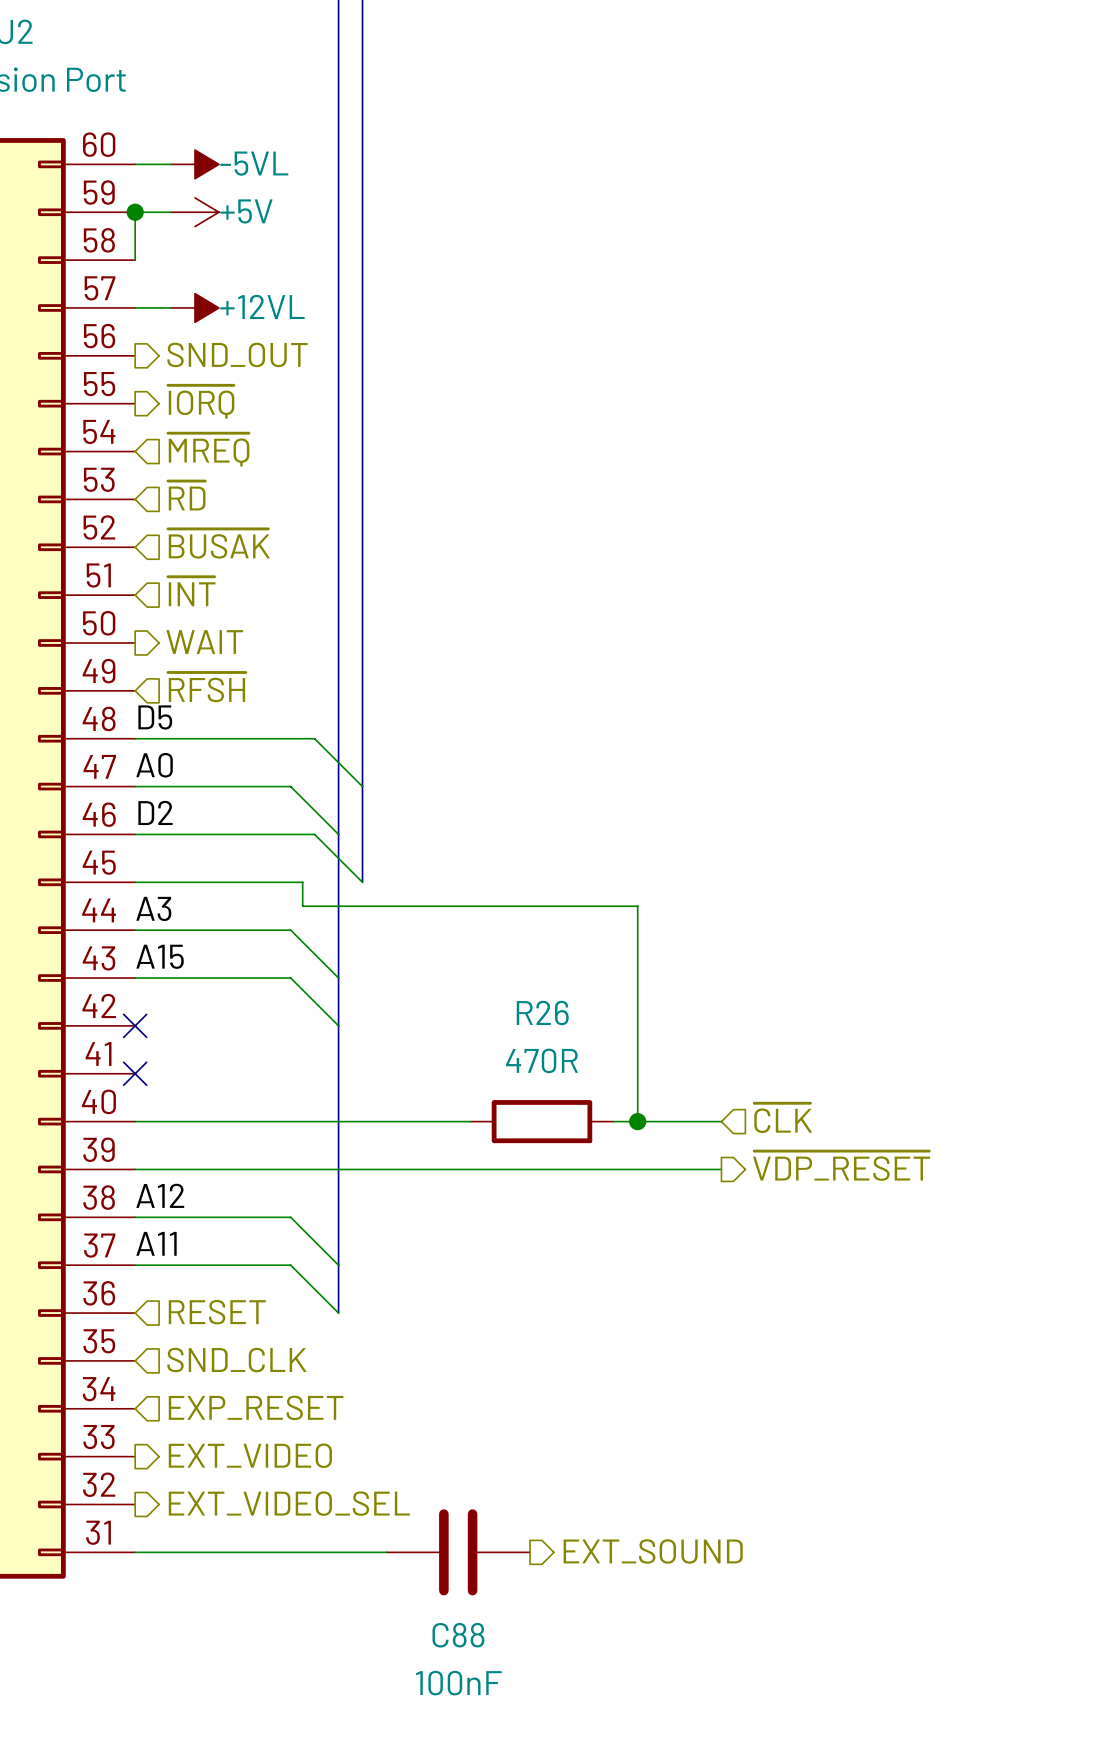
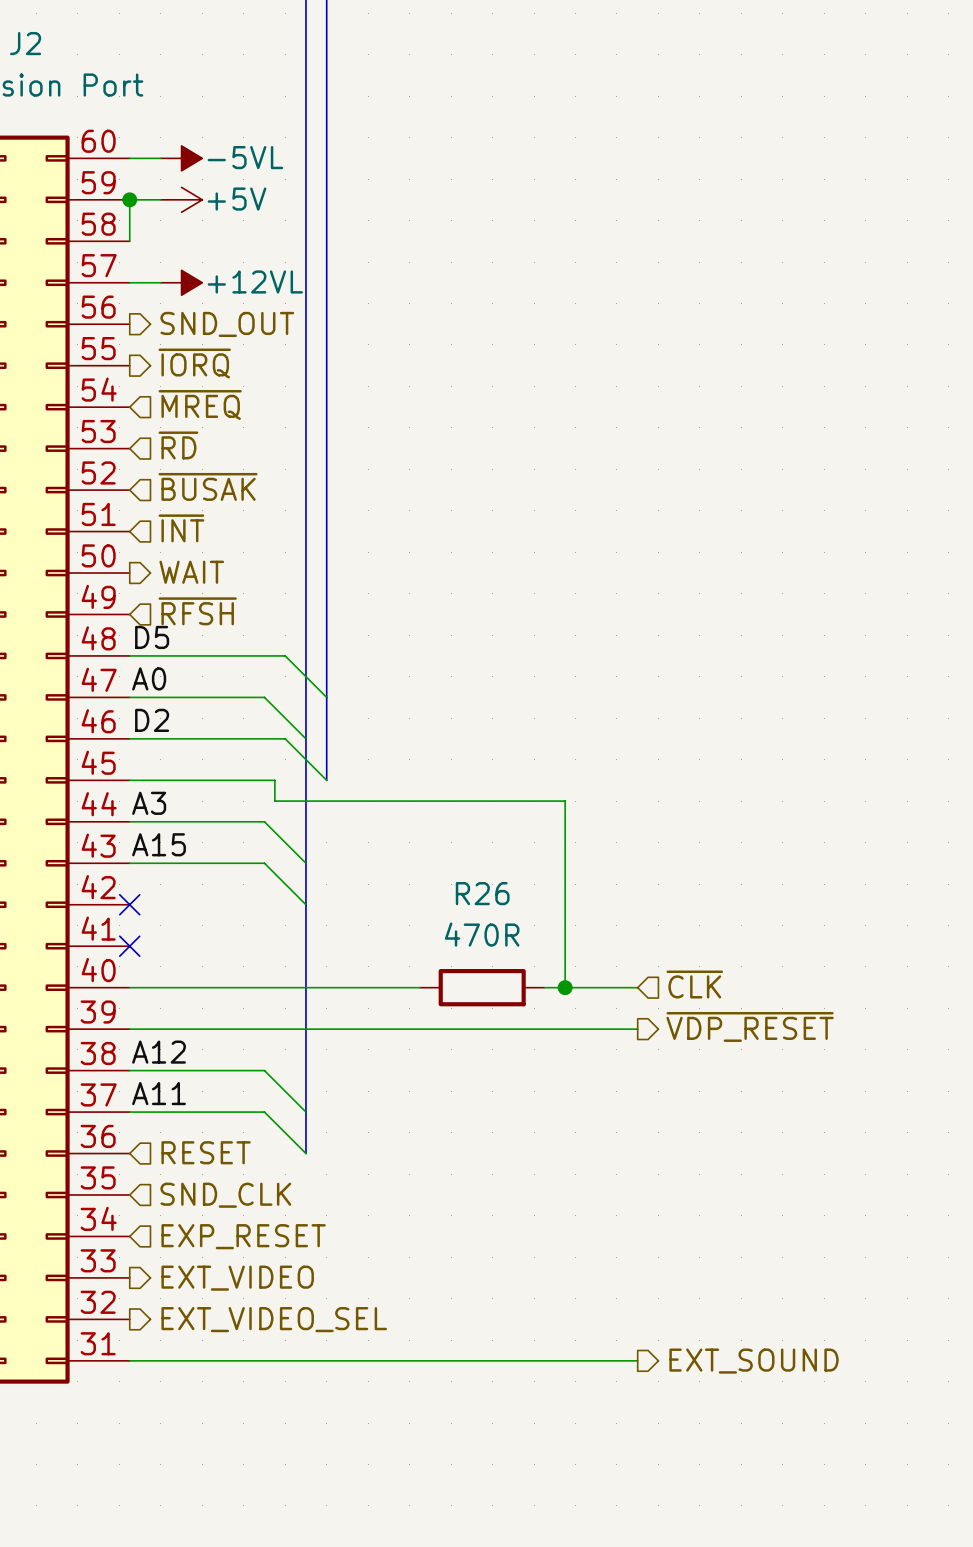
hierarchical label position: EXT_SOUND (653, 1551) -> EXT_SOUND (754, 1361)
wire: none -> (347, 1360) (637, 1360)
C88: 100nF (458, 1552) -> none

